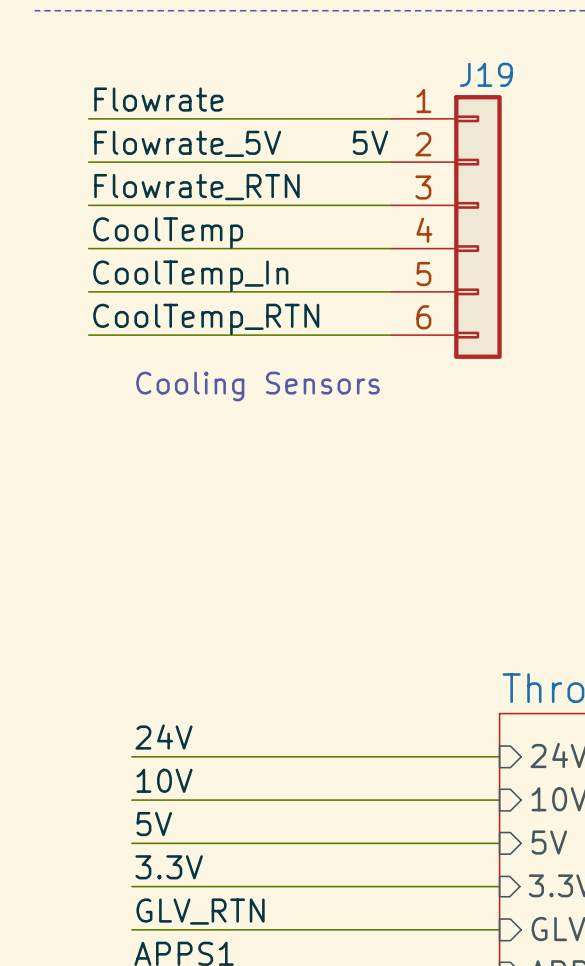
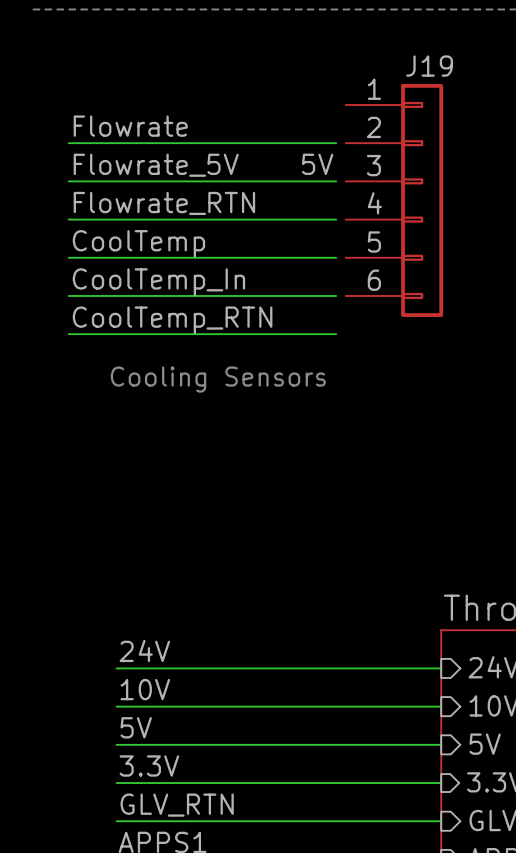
label position: Flowrate (158, 99) -> Flowrate (130, 126)
wire: (88, 118) (391, 118) -> (68, 334) (336, 334)
label position: 5V (370, 142) -> 5V (317, 164)
label position: Flowrate_5V (187, 143) -> Flowrate_5V (156, 165)
wire: (380, 162) (391, 162) -> (68, 143) (78, 143)
label position: Flowrate_RTN (196, 187) -> Flowrate_RTN (164, 203)
wire: (380, 205) (391, 205) -> (68, 181) (78, 181)
label position: CoolTemp (168, 232) -> CoolTemp (138, 243)
wire: (380, 248) (391, 248) -> (68, 219) (78, 219)
label position: CoolTemp_In (190, 276) -> CoolTemp_In (158, 282)
wire: (380, 291) (391, 291) -> (68, 257) (78, 257)
label position: CoolTemp_RTN (206, 319) -> CoolTemp_RTN (172, 320)
wire: (380, 335) (391, 335) -> (68, 295) (78, 295)
text position: Cooling Sensors (258, 386) -> Cooling Sensors (218, 379)

